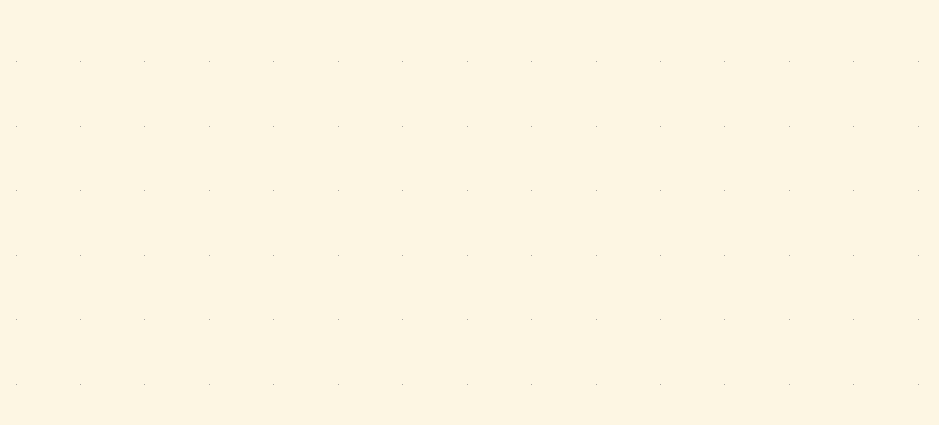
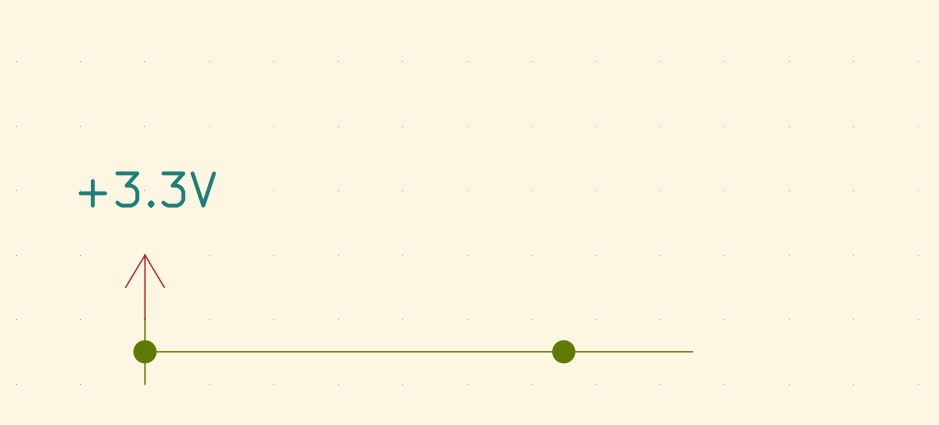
power symbol: none -> +3.3V (144, 287)
wire: none -> (144, 319) (144, 384)
wire: none -> (144, 351) (692, 351)
junction: none -> (144, 351)
junction: none -> (563, 351)

